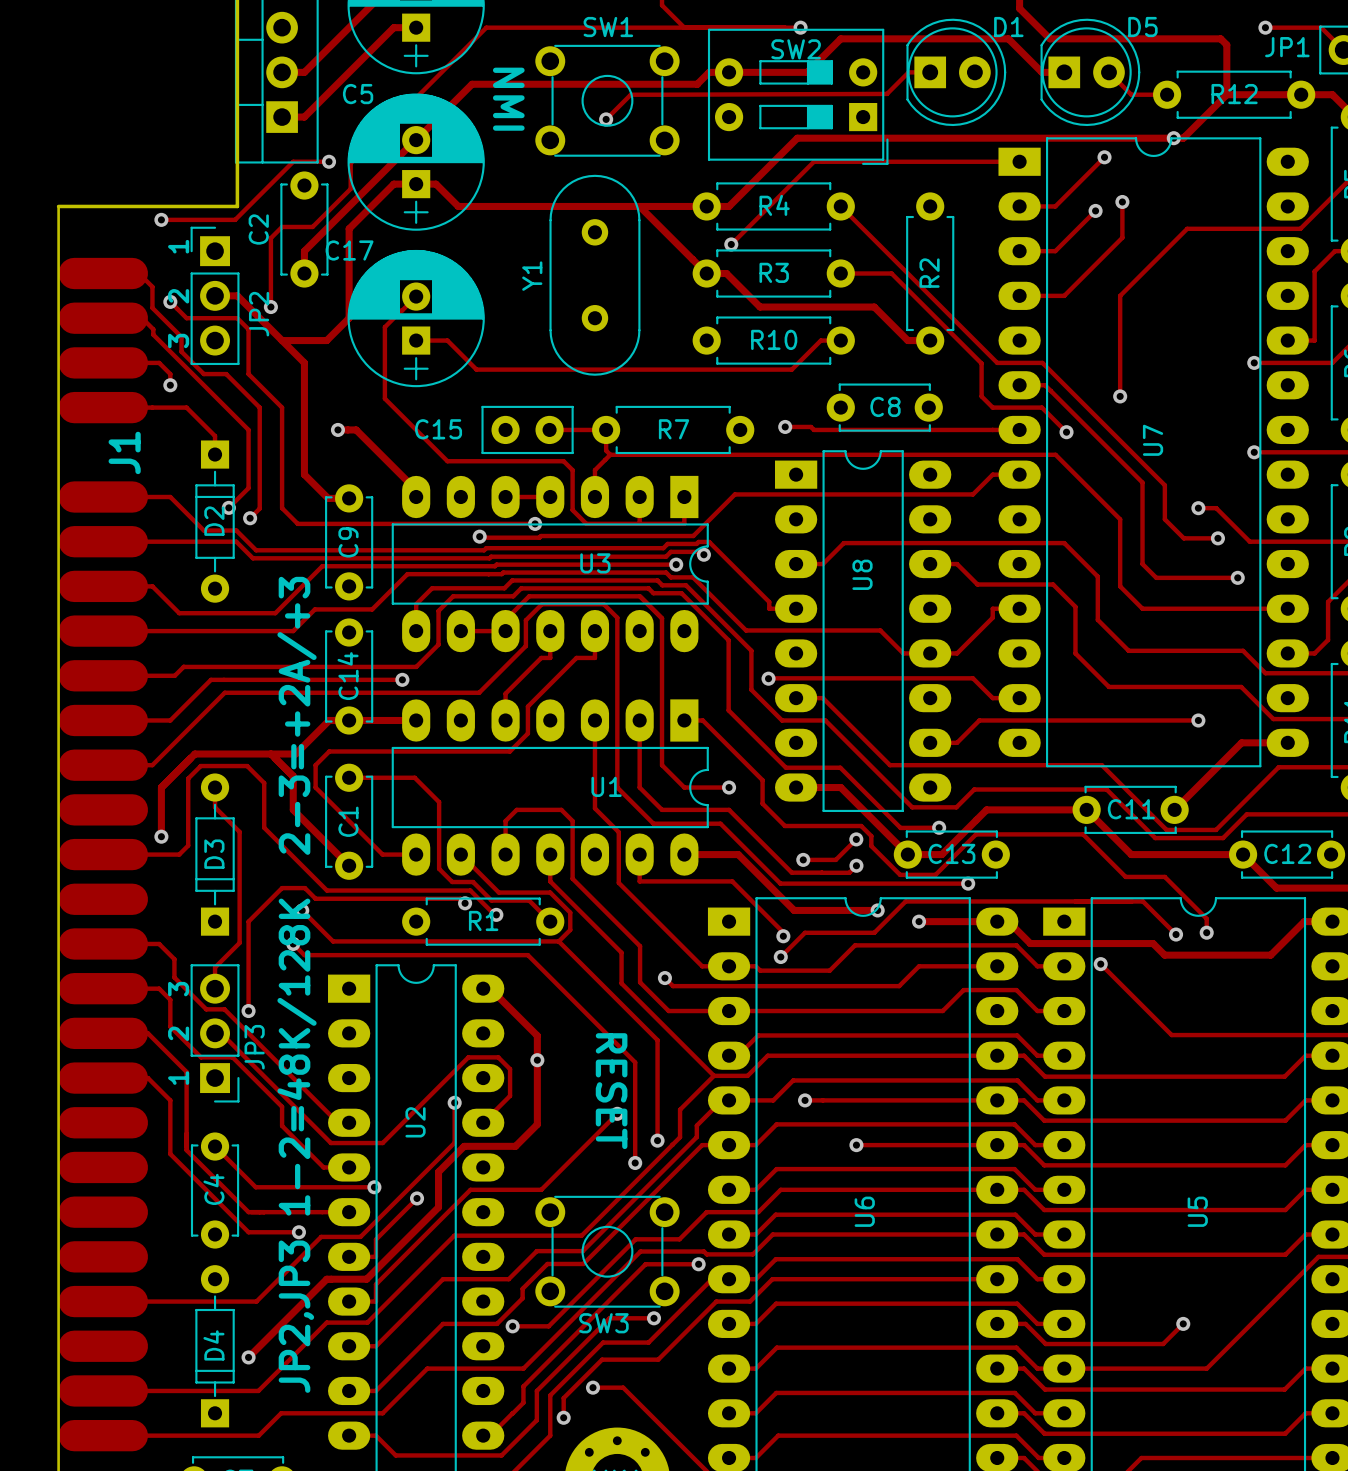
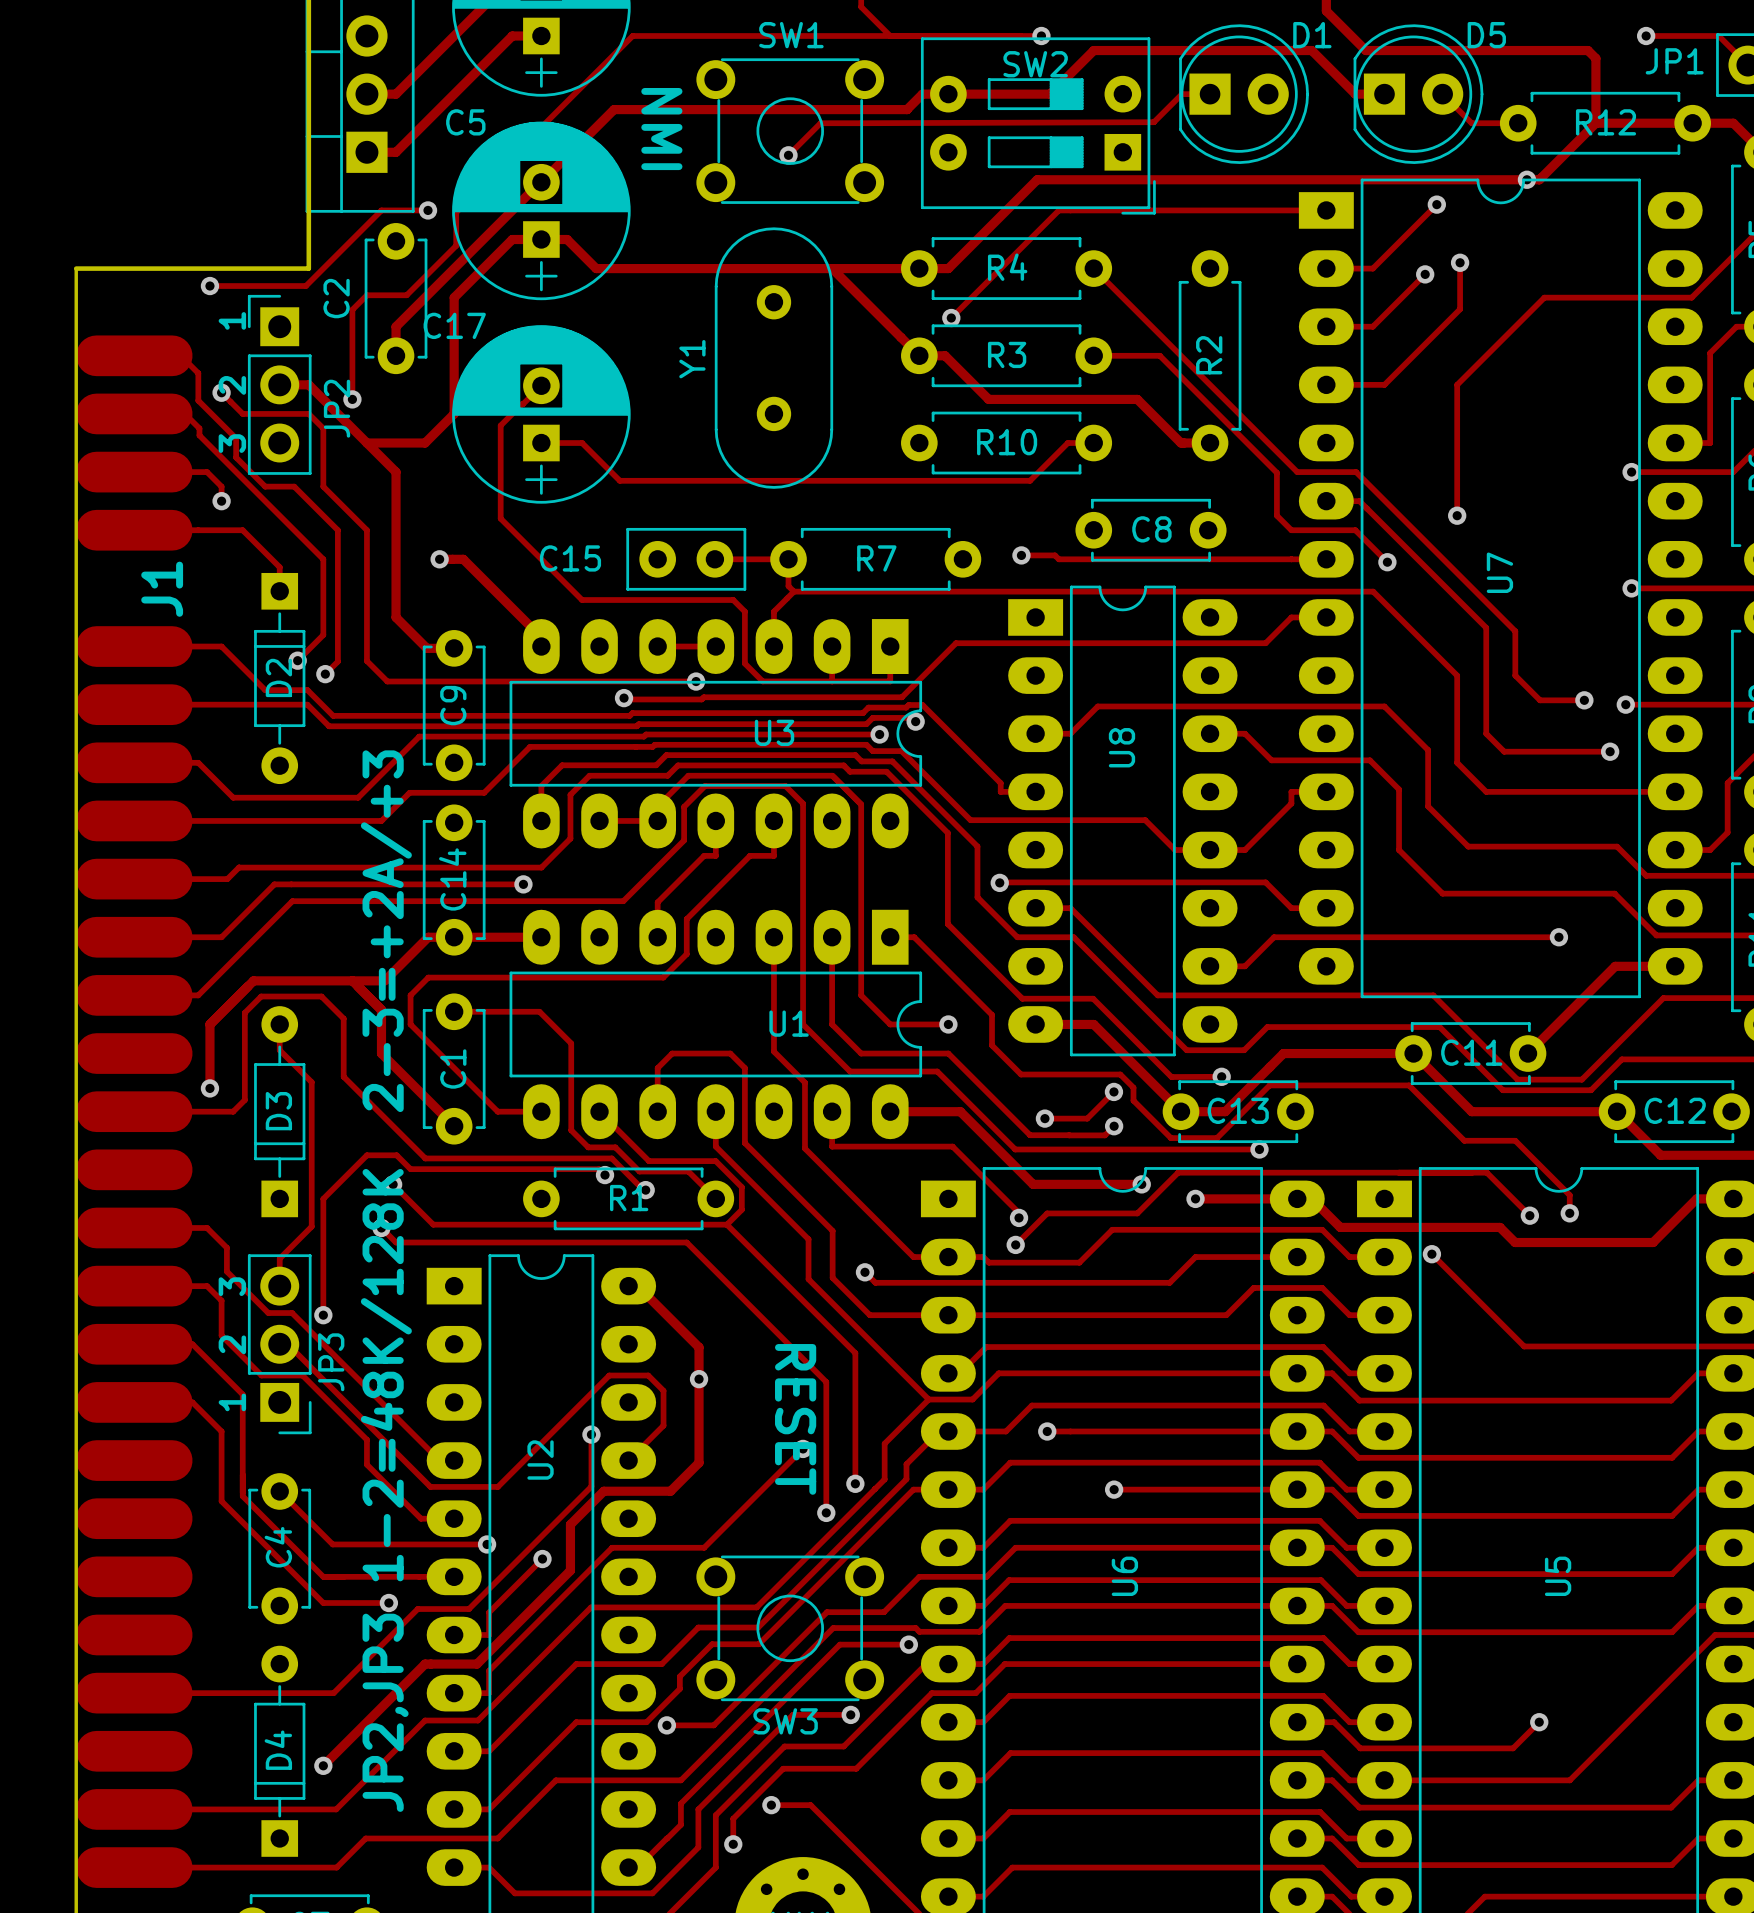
track: (1198, 508) (1216, 508) (1249, 541) -> none
via position: (1198, 508) -> (1625, 704)

